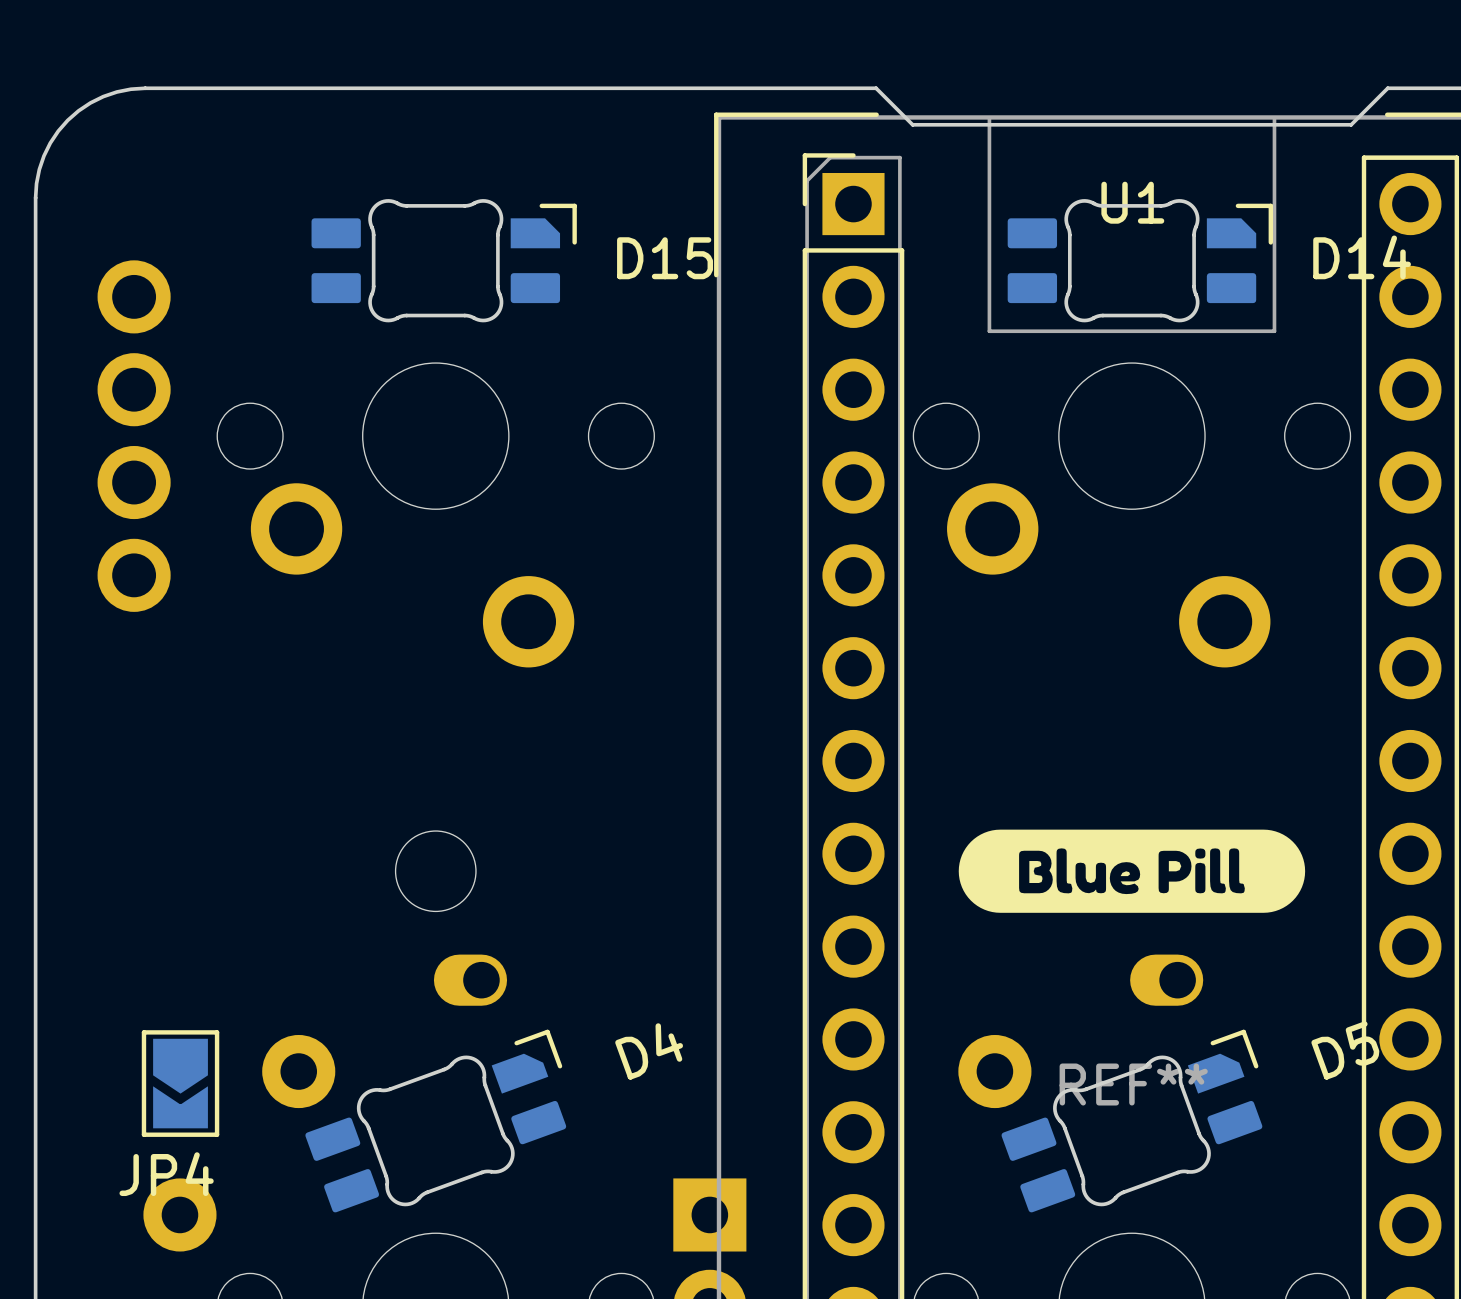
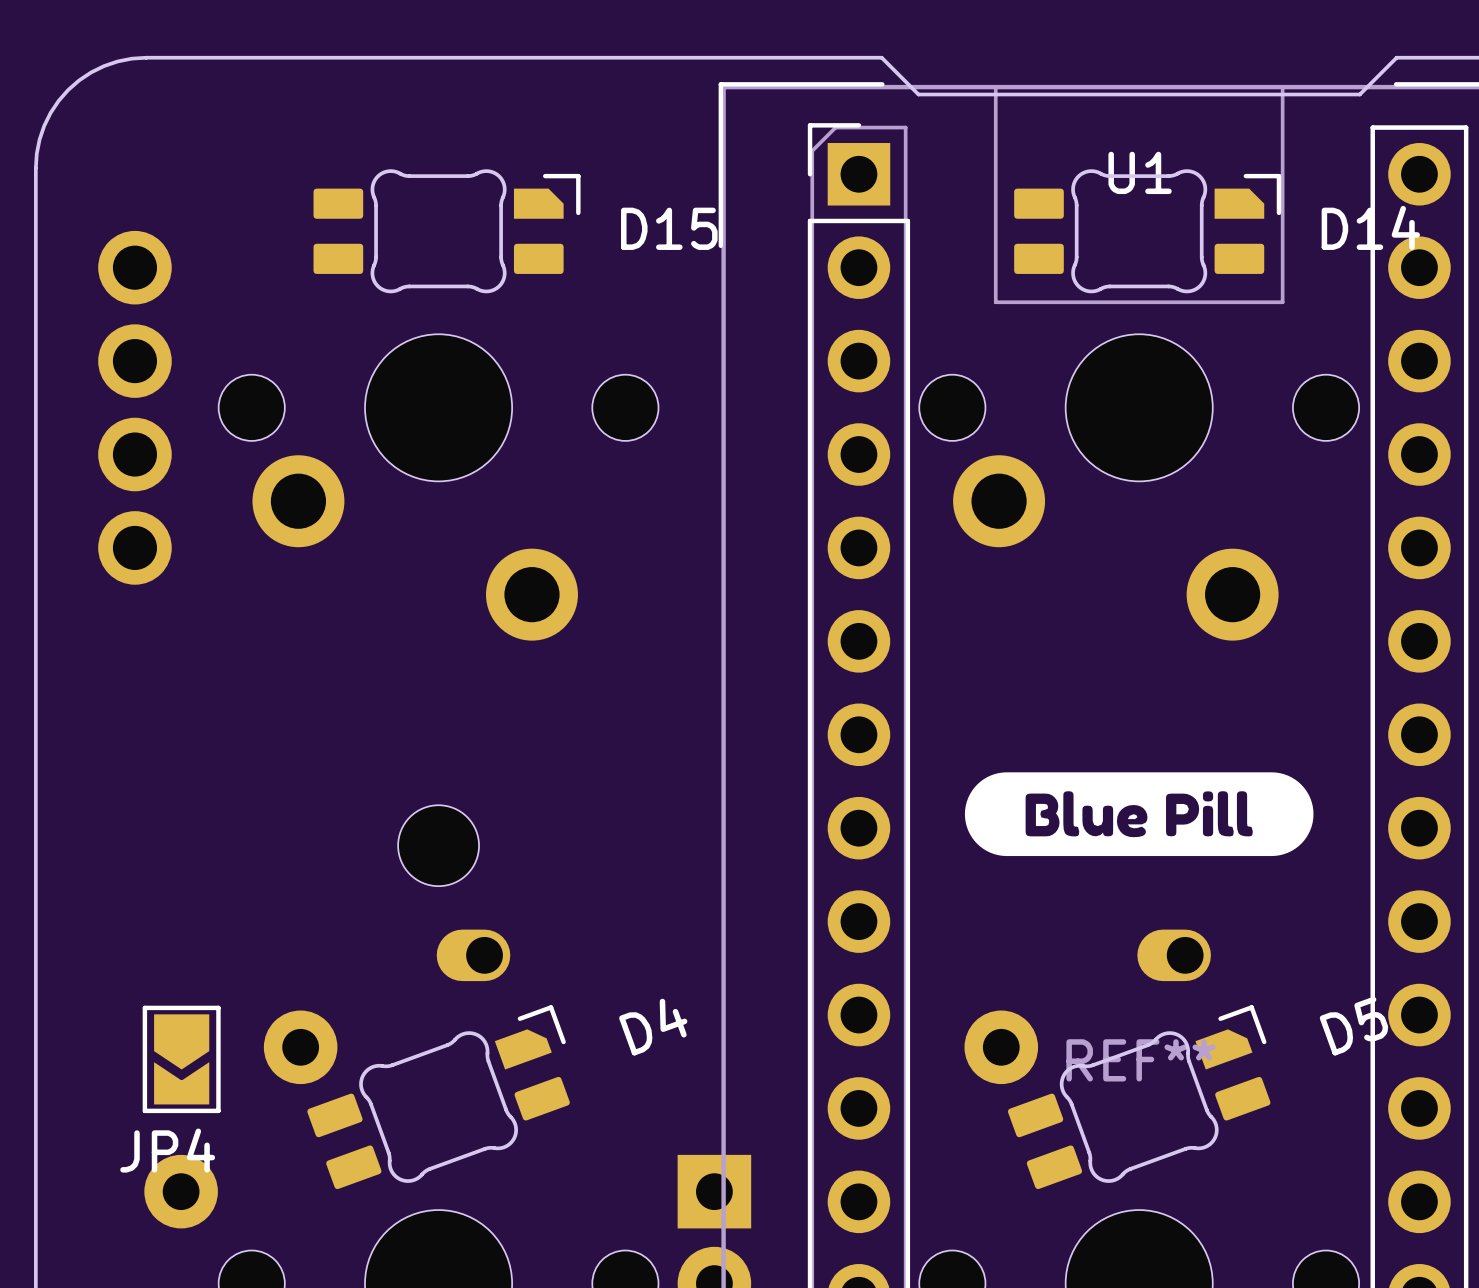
drawing position: (1131, 871) -> (1139, 814)

